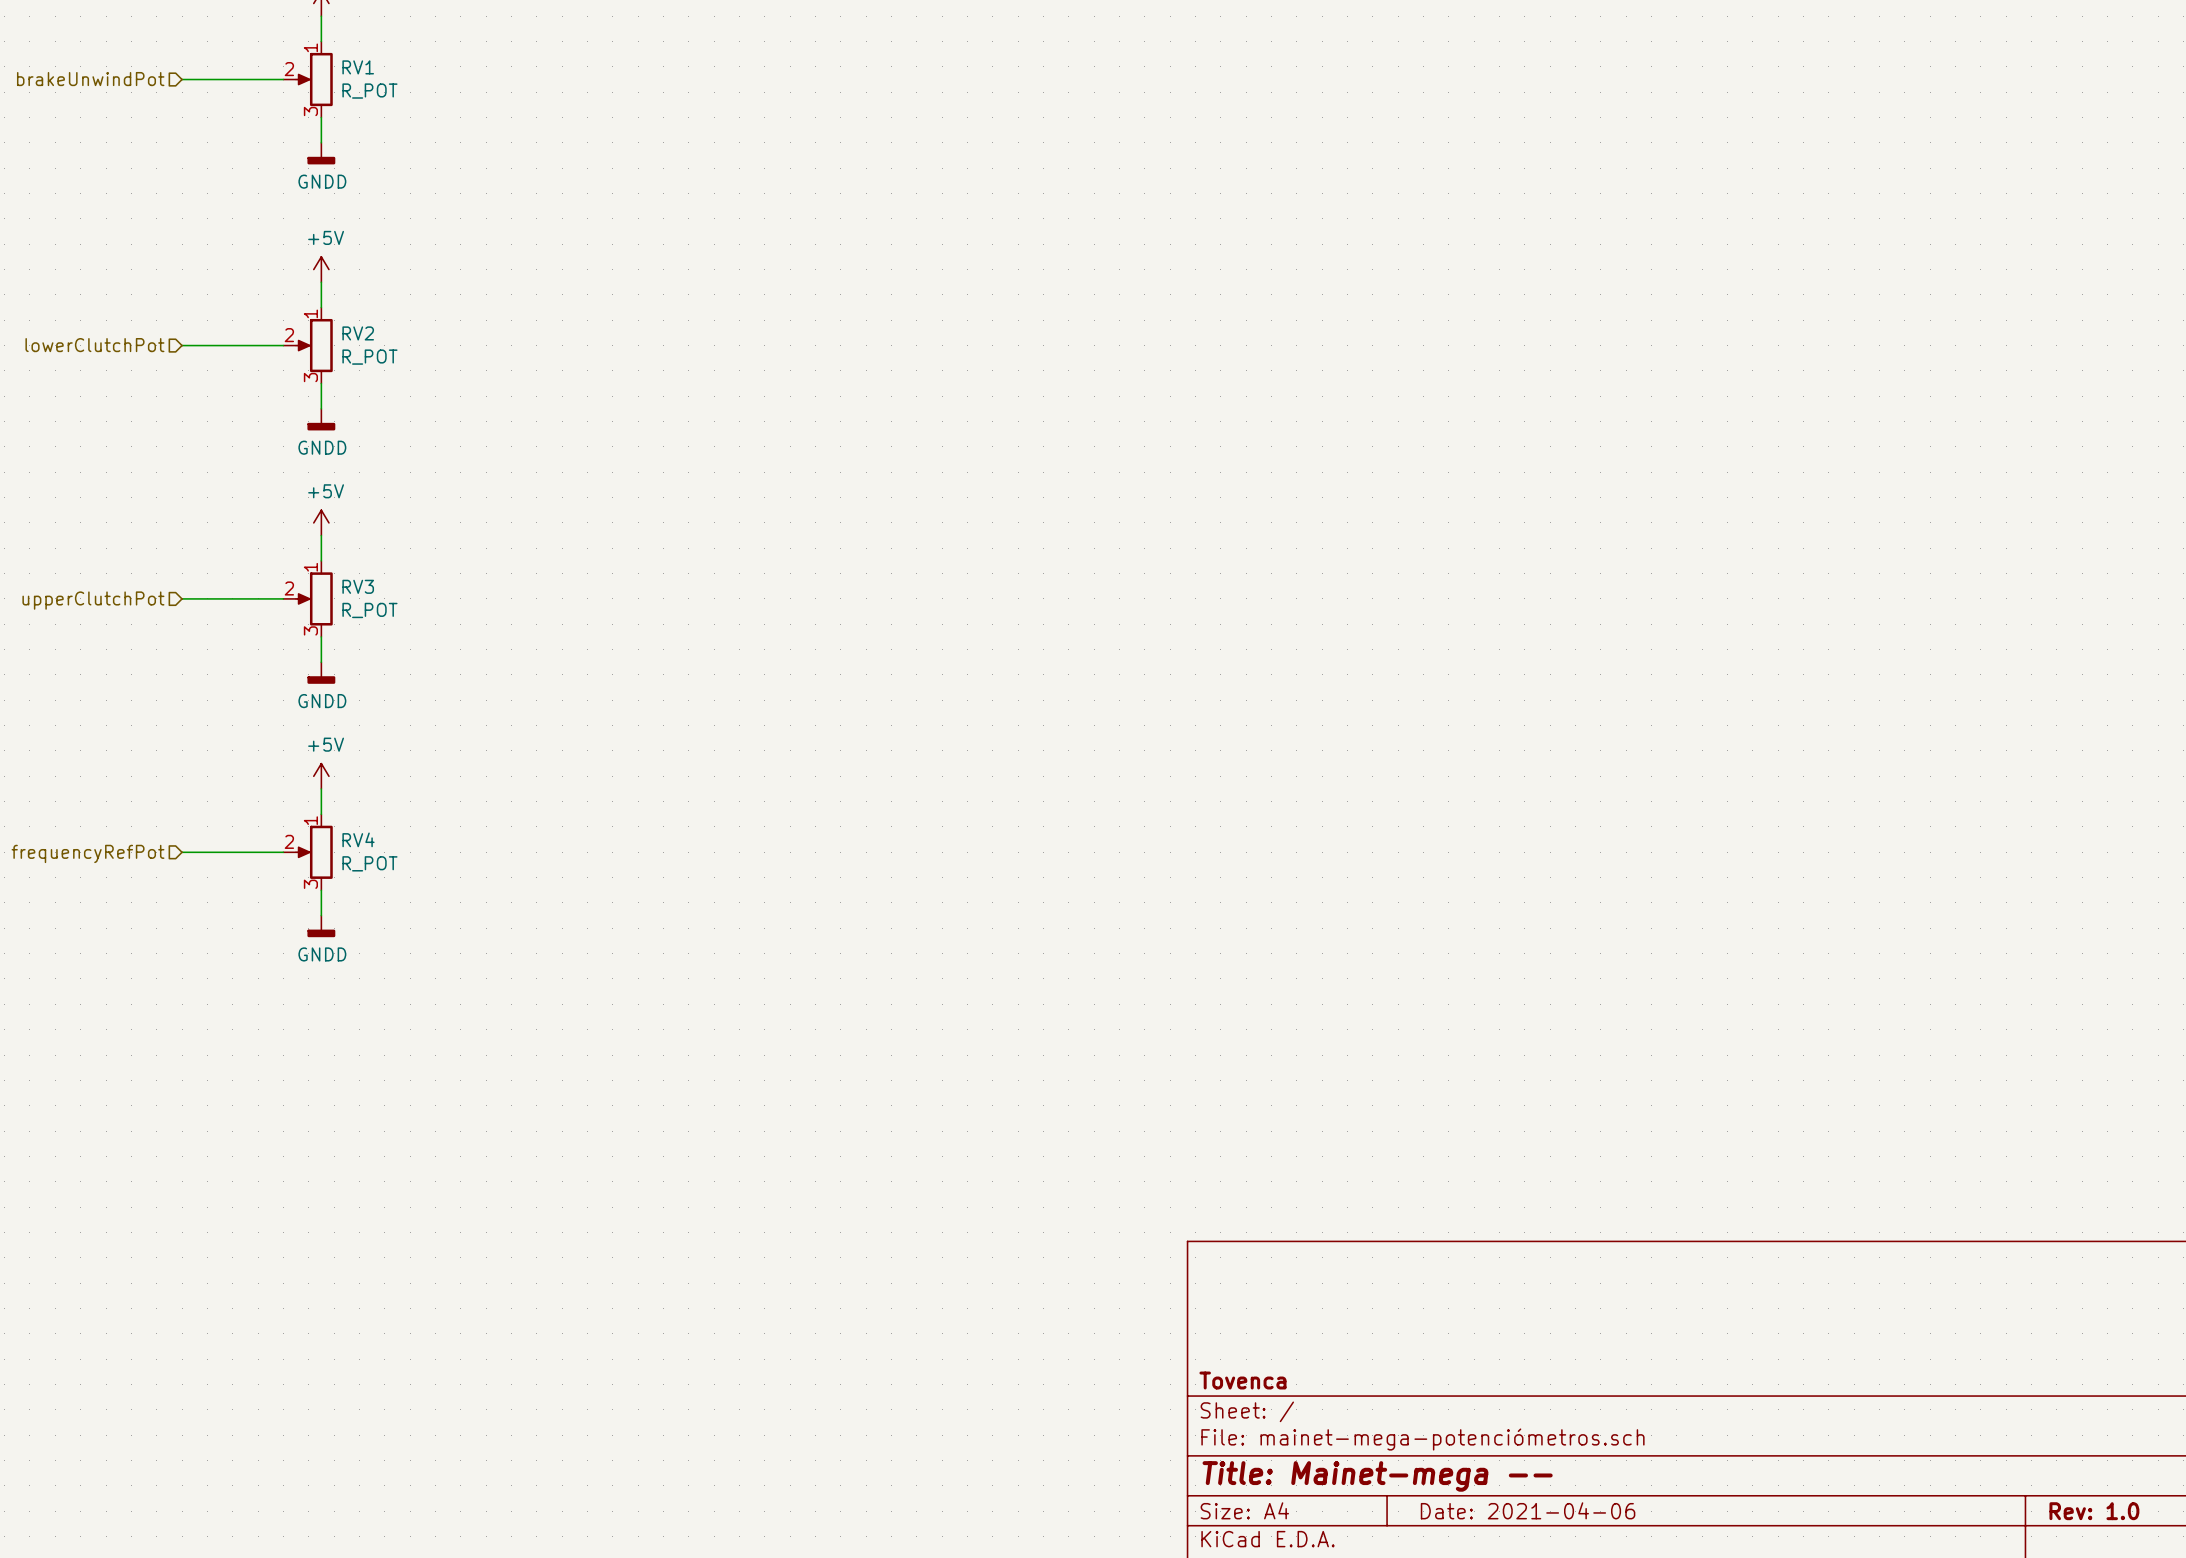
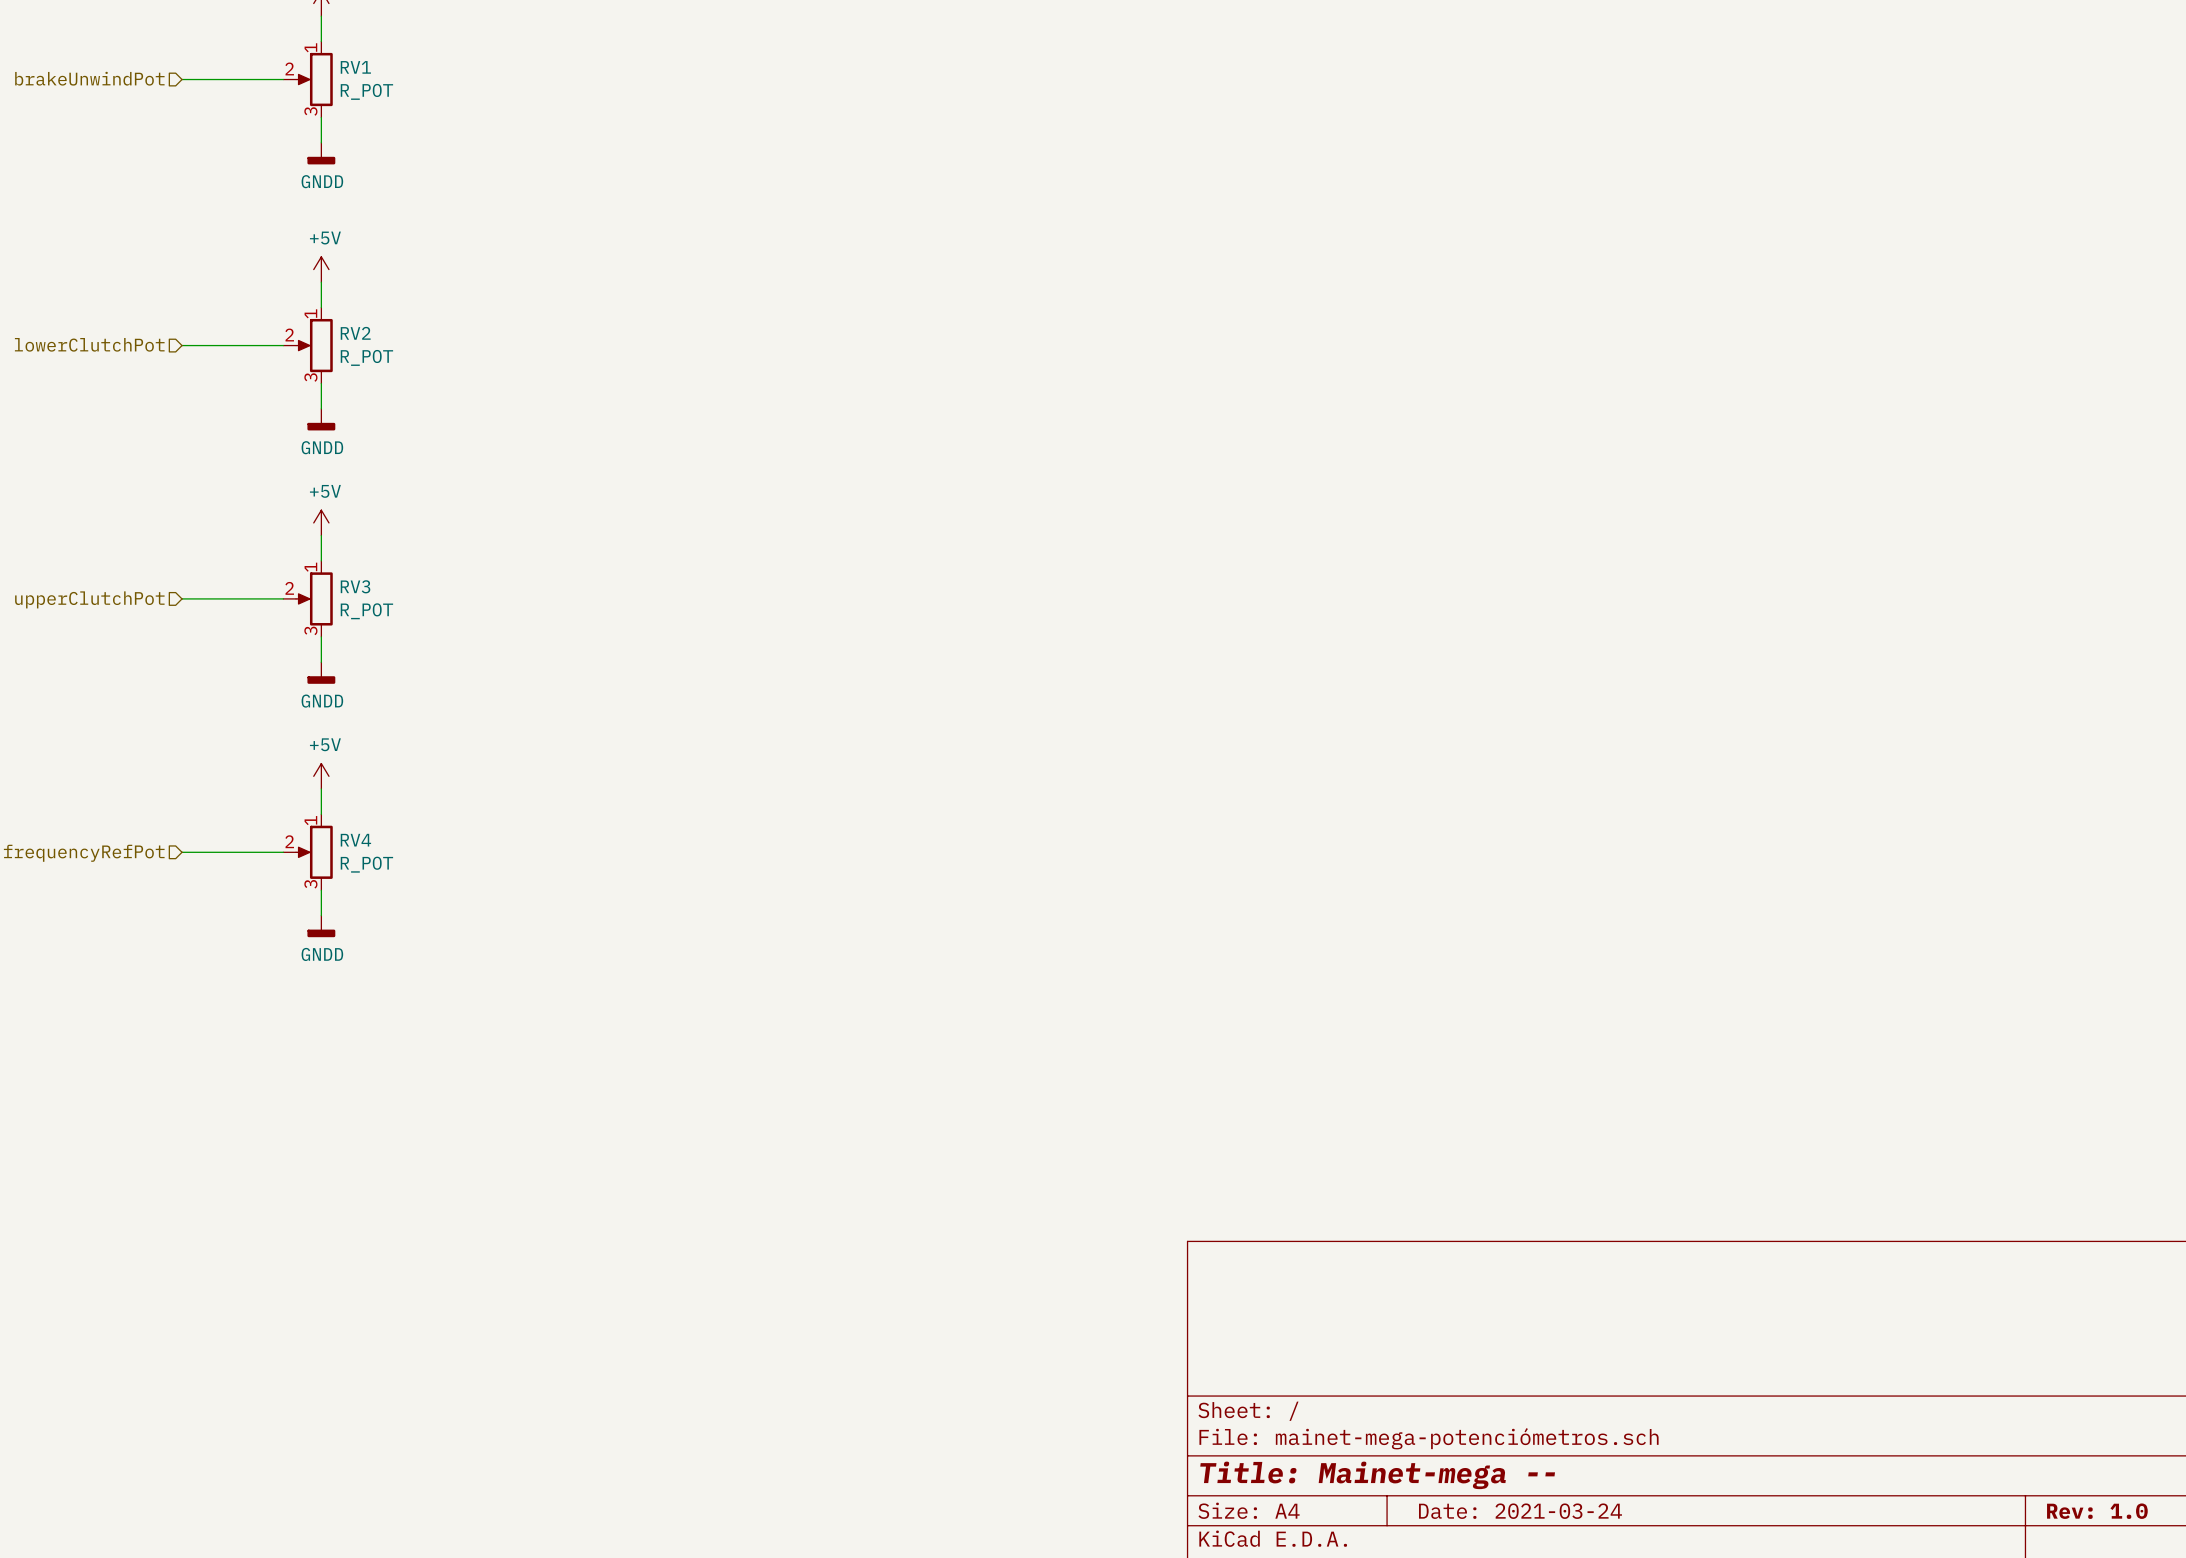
title block: Tovenca (1242, 1380) -> none
title block: Date: 2021-04-06 (1528, 1510) -> Date: 2021-03-24 (1520, 1511)

